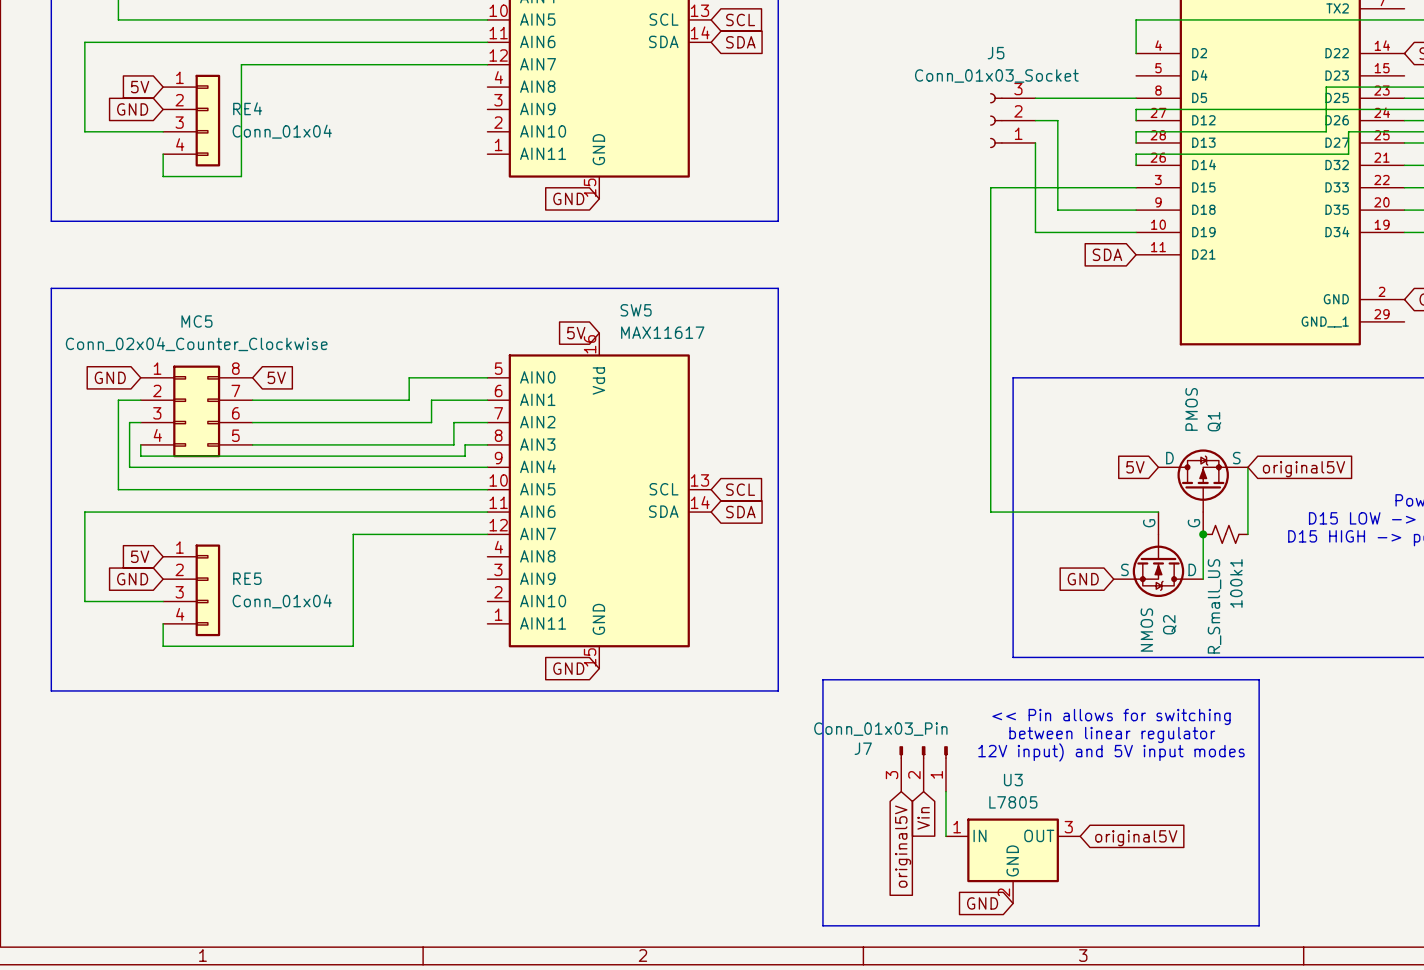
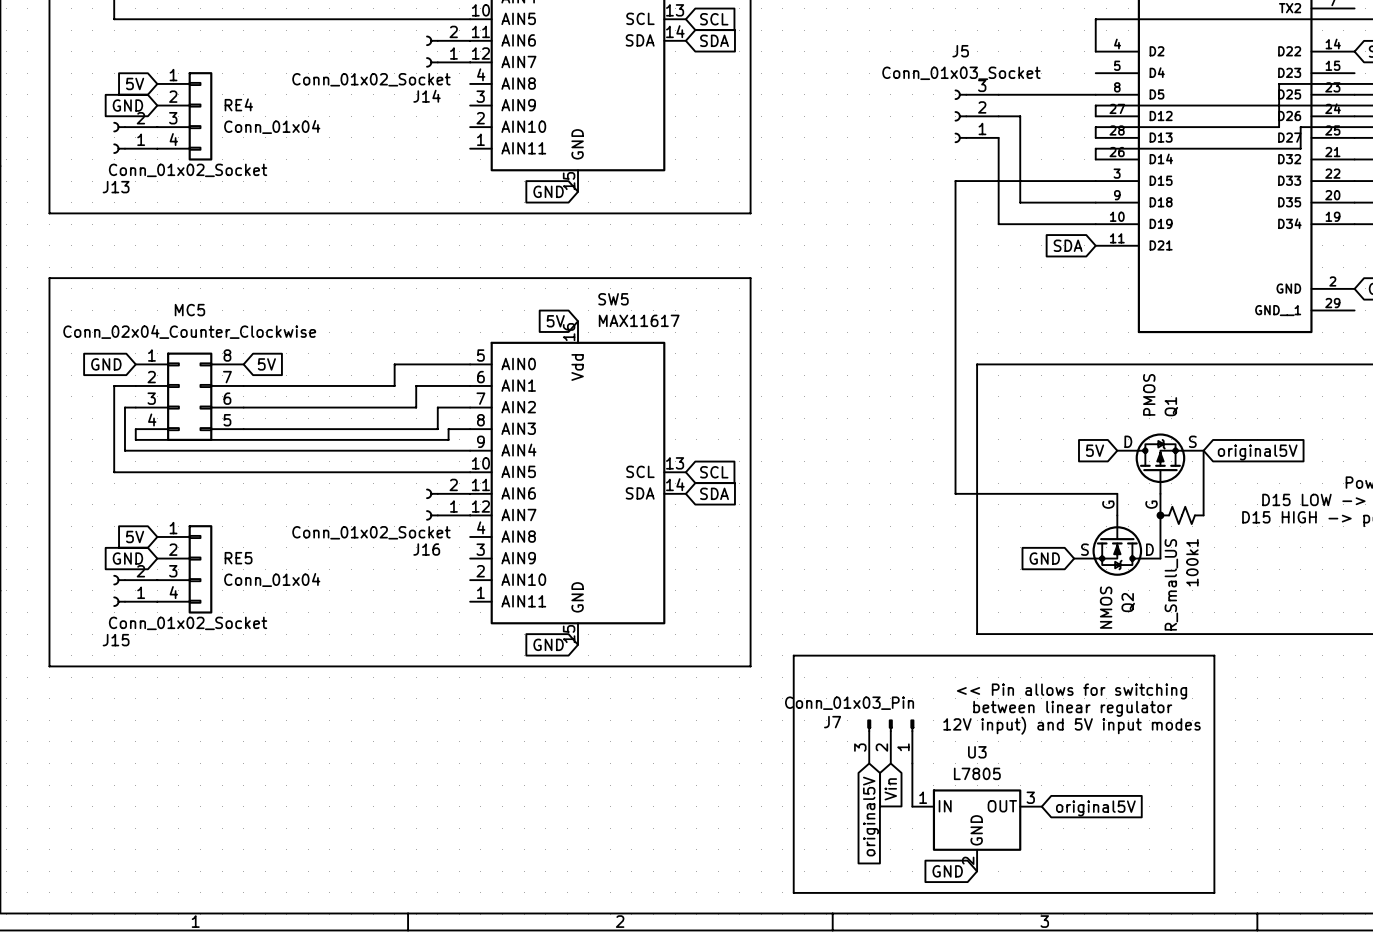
wire: (487, 42) (84, 42) (84, 131) (163, 131) -> none
J14: none -> Conn_01x02_Socket (448, 51)
wire: (487, 64) (241, 64) (241, 176) (163, 176) (163, 154) -> none
J13: none -> Conn_01x02_Socket (135, 137)
wire: (487, 512) (84, 512) (84, 601) (163, 601) -> none
J16: none -> Conn_01x02_Socket (448, 504)
wire: (487, 534) (353, 534) (353, 646) (163, 646) (163, 623) -> none
J15: none -> Conn_01x02_Socket (135, 590)

